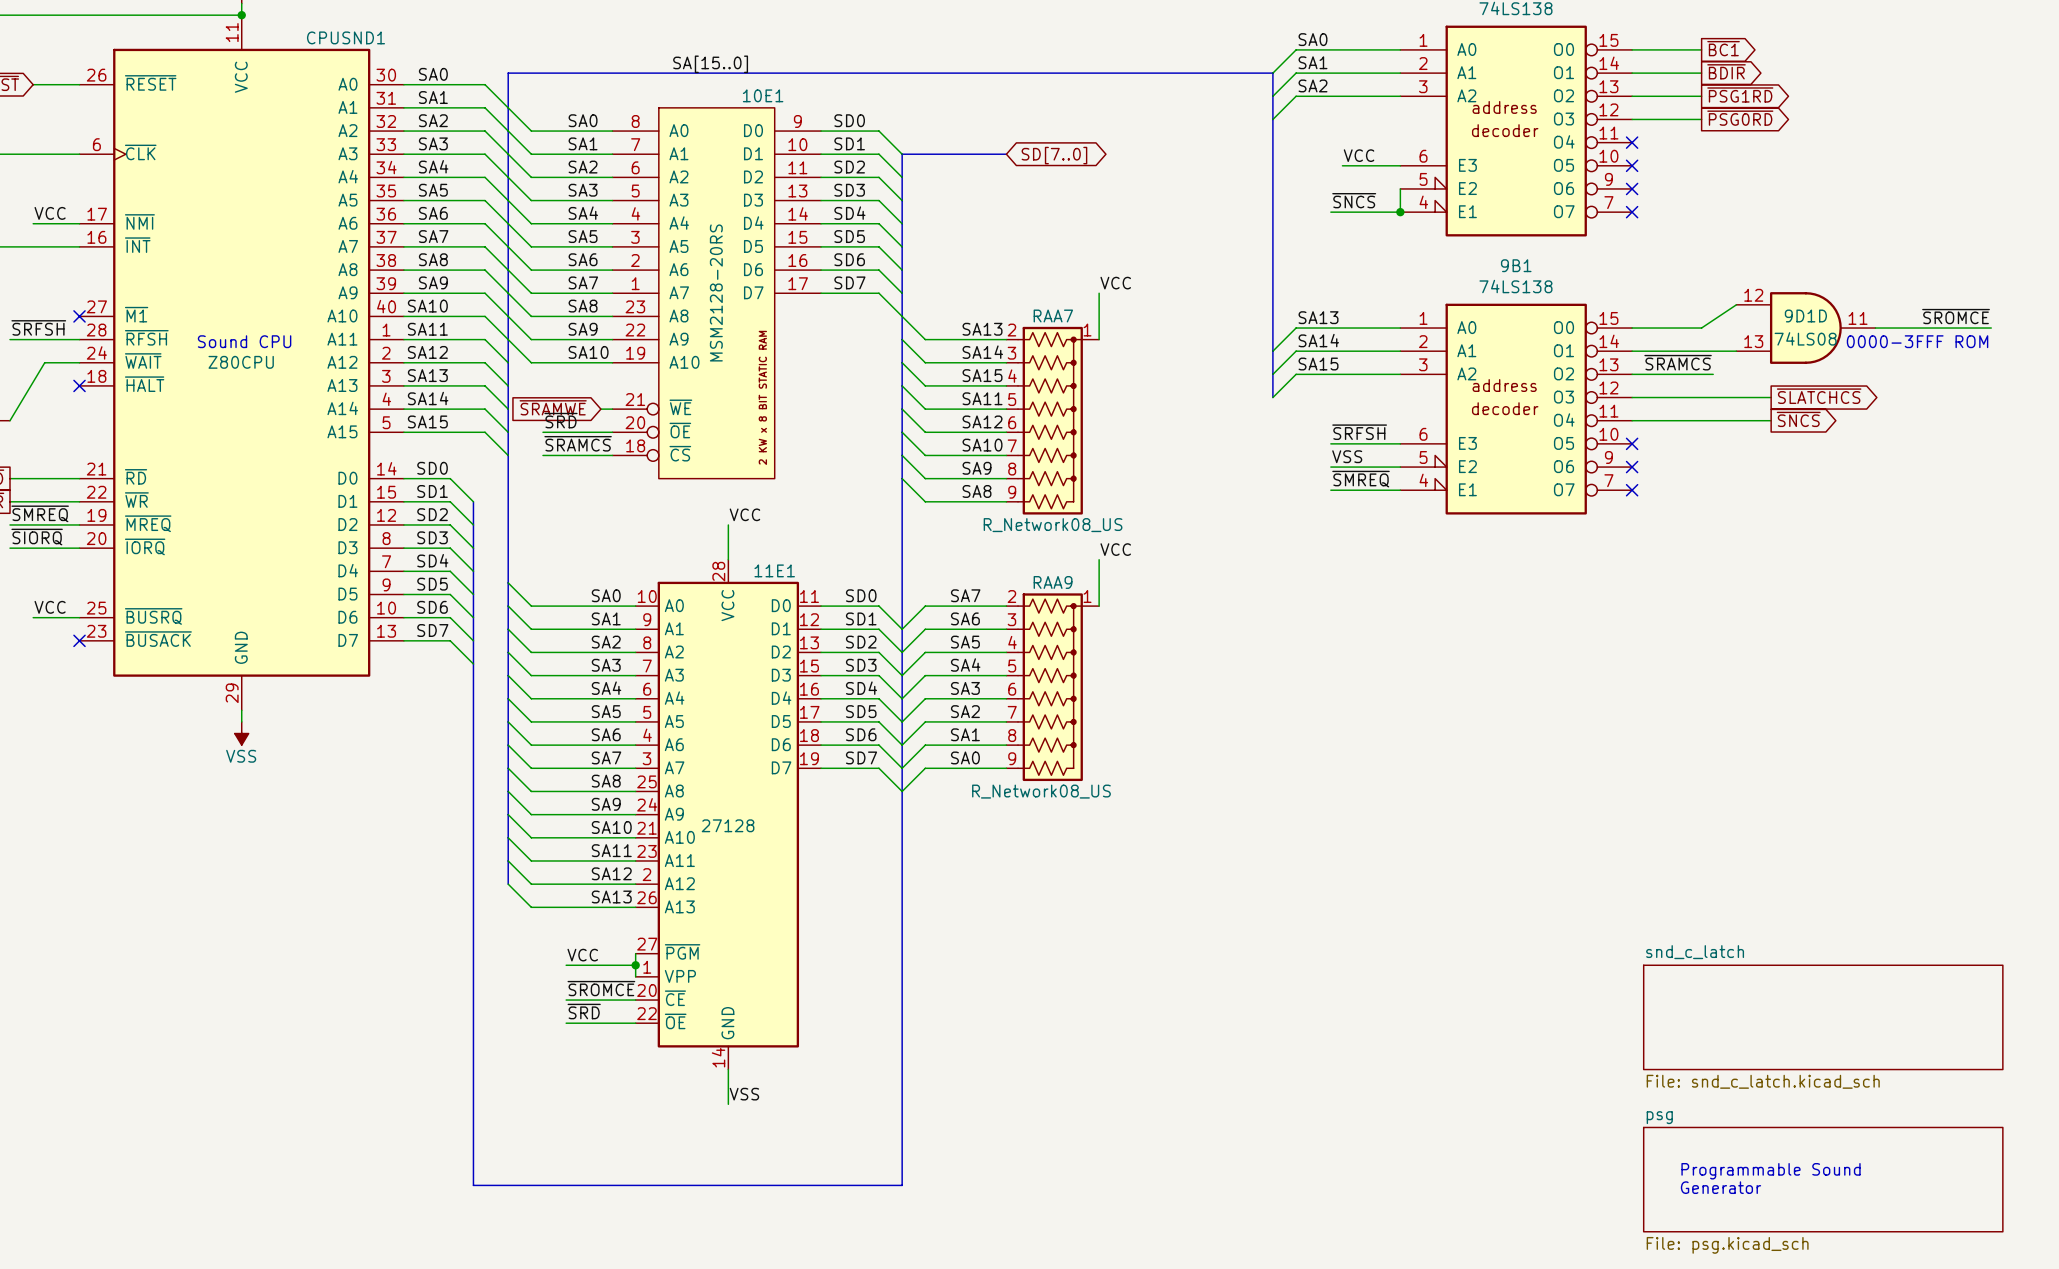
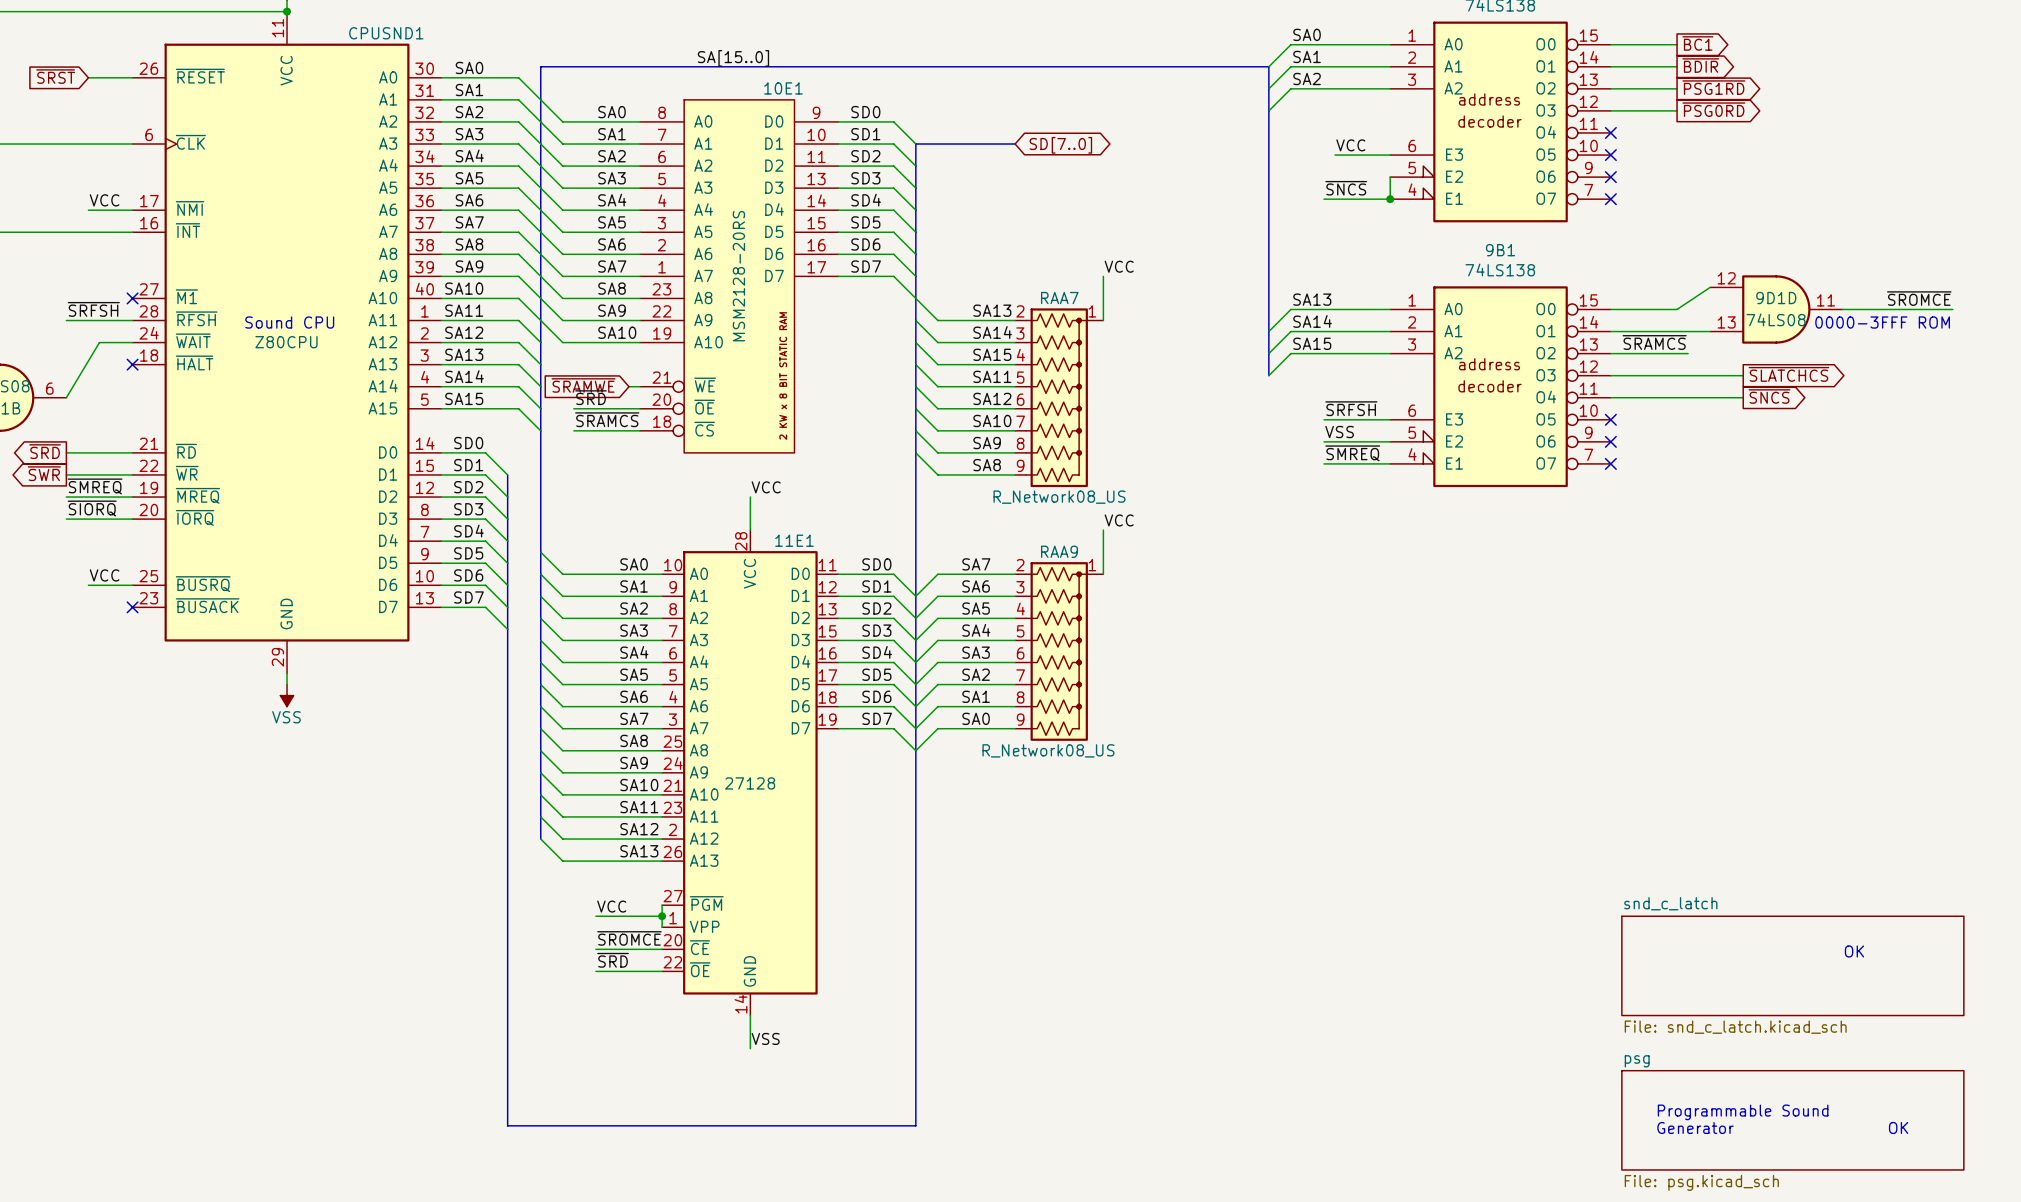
text: none -> OK (1854, 951)
text: none -> OK (1898, 1127)

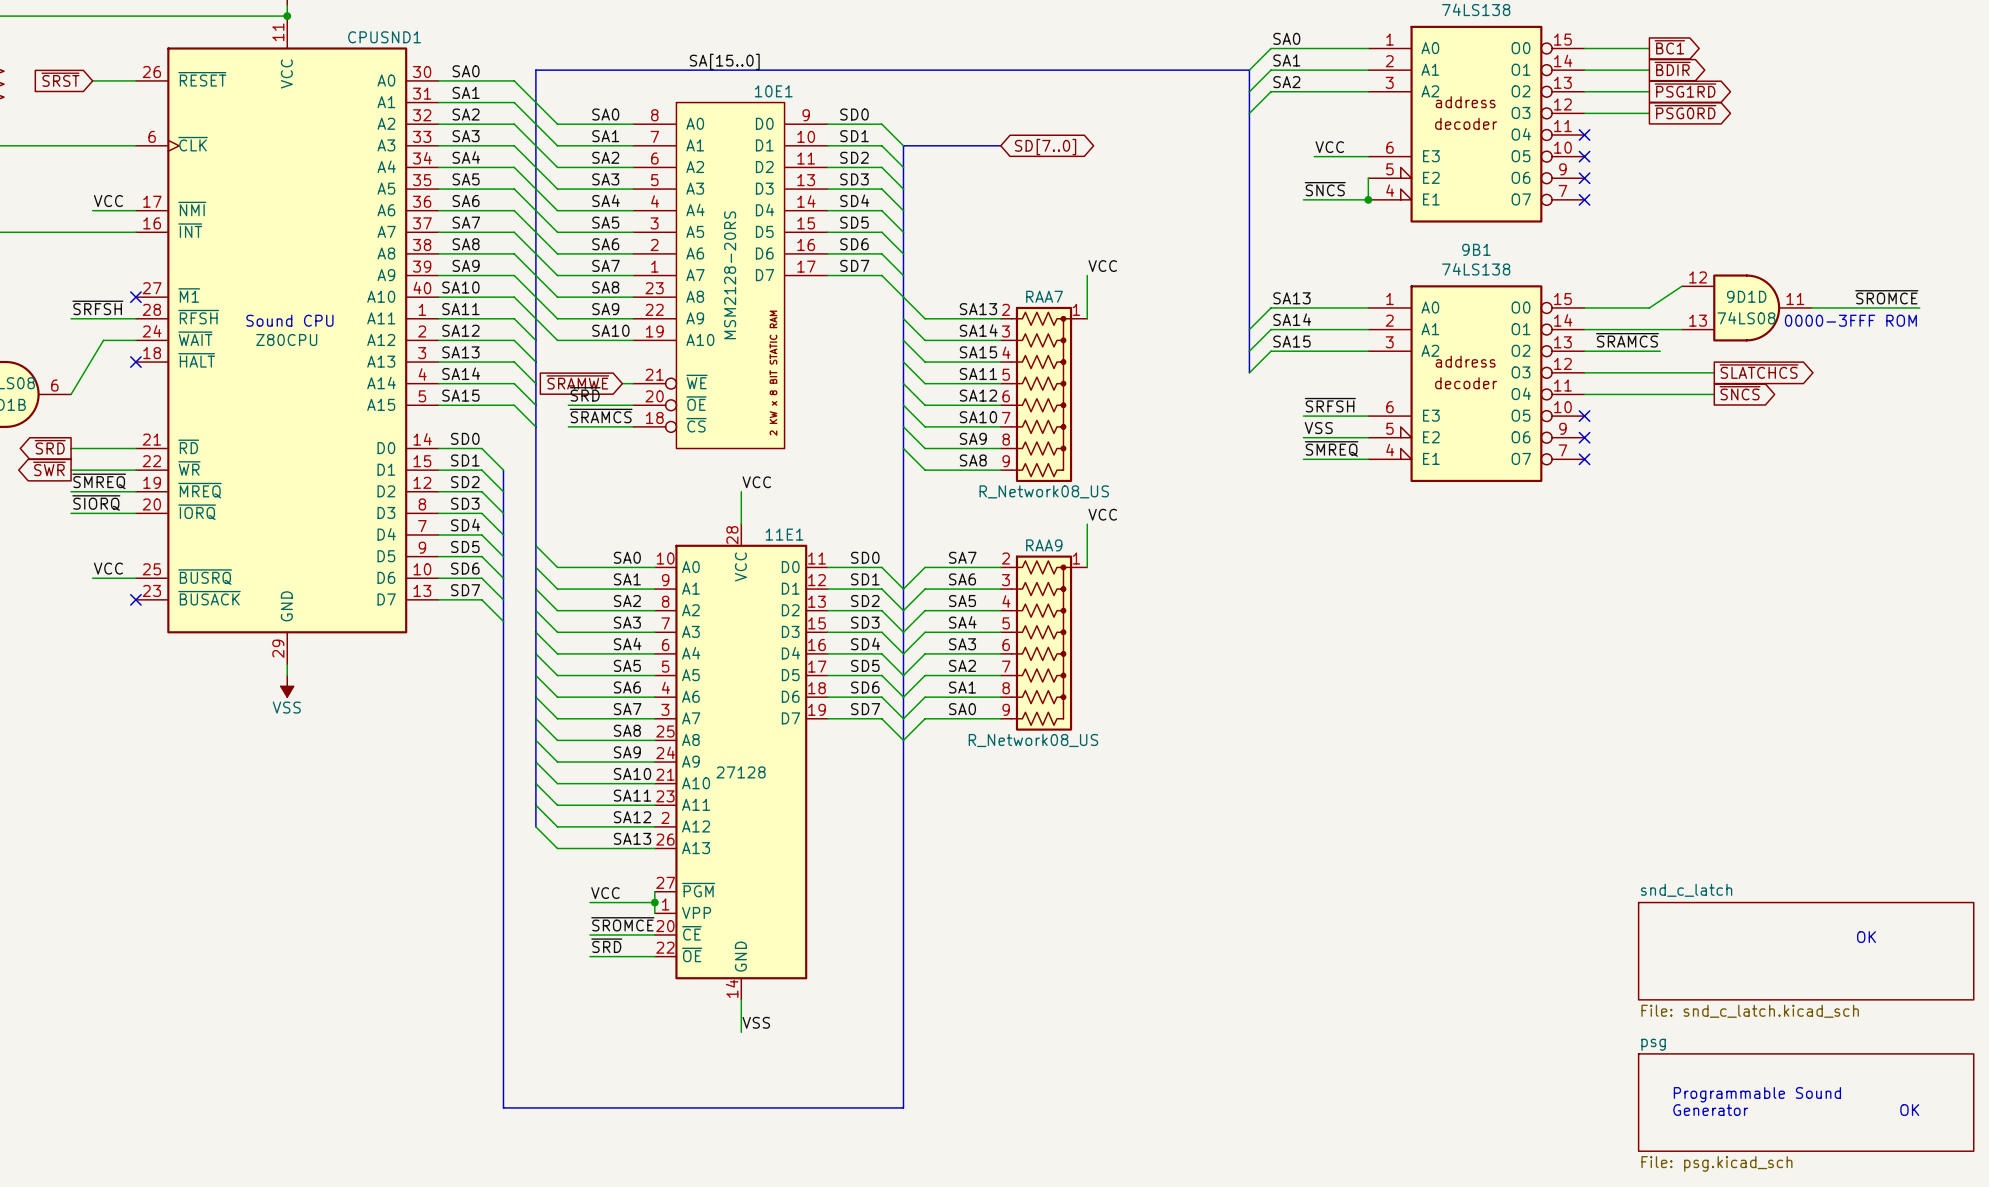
text position: OK (1854, 951) -> OK (1866, 937)
sheet snd_c_latch position: (1792, 965) -> (1806, 951)
text position: Programmable Sound (1743, 1112) -> Programmable Sound (1757, 1094)
sheet psg position: (1792, 1120) -> (1806, 1102)
text position: Generator (1695, 1127) -> Generator (1710, 1110)
text position: OK (1898, 1127) -> OK (1909, 1110)

